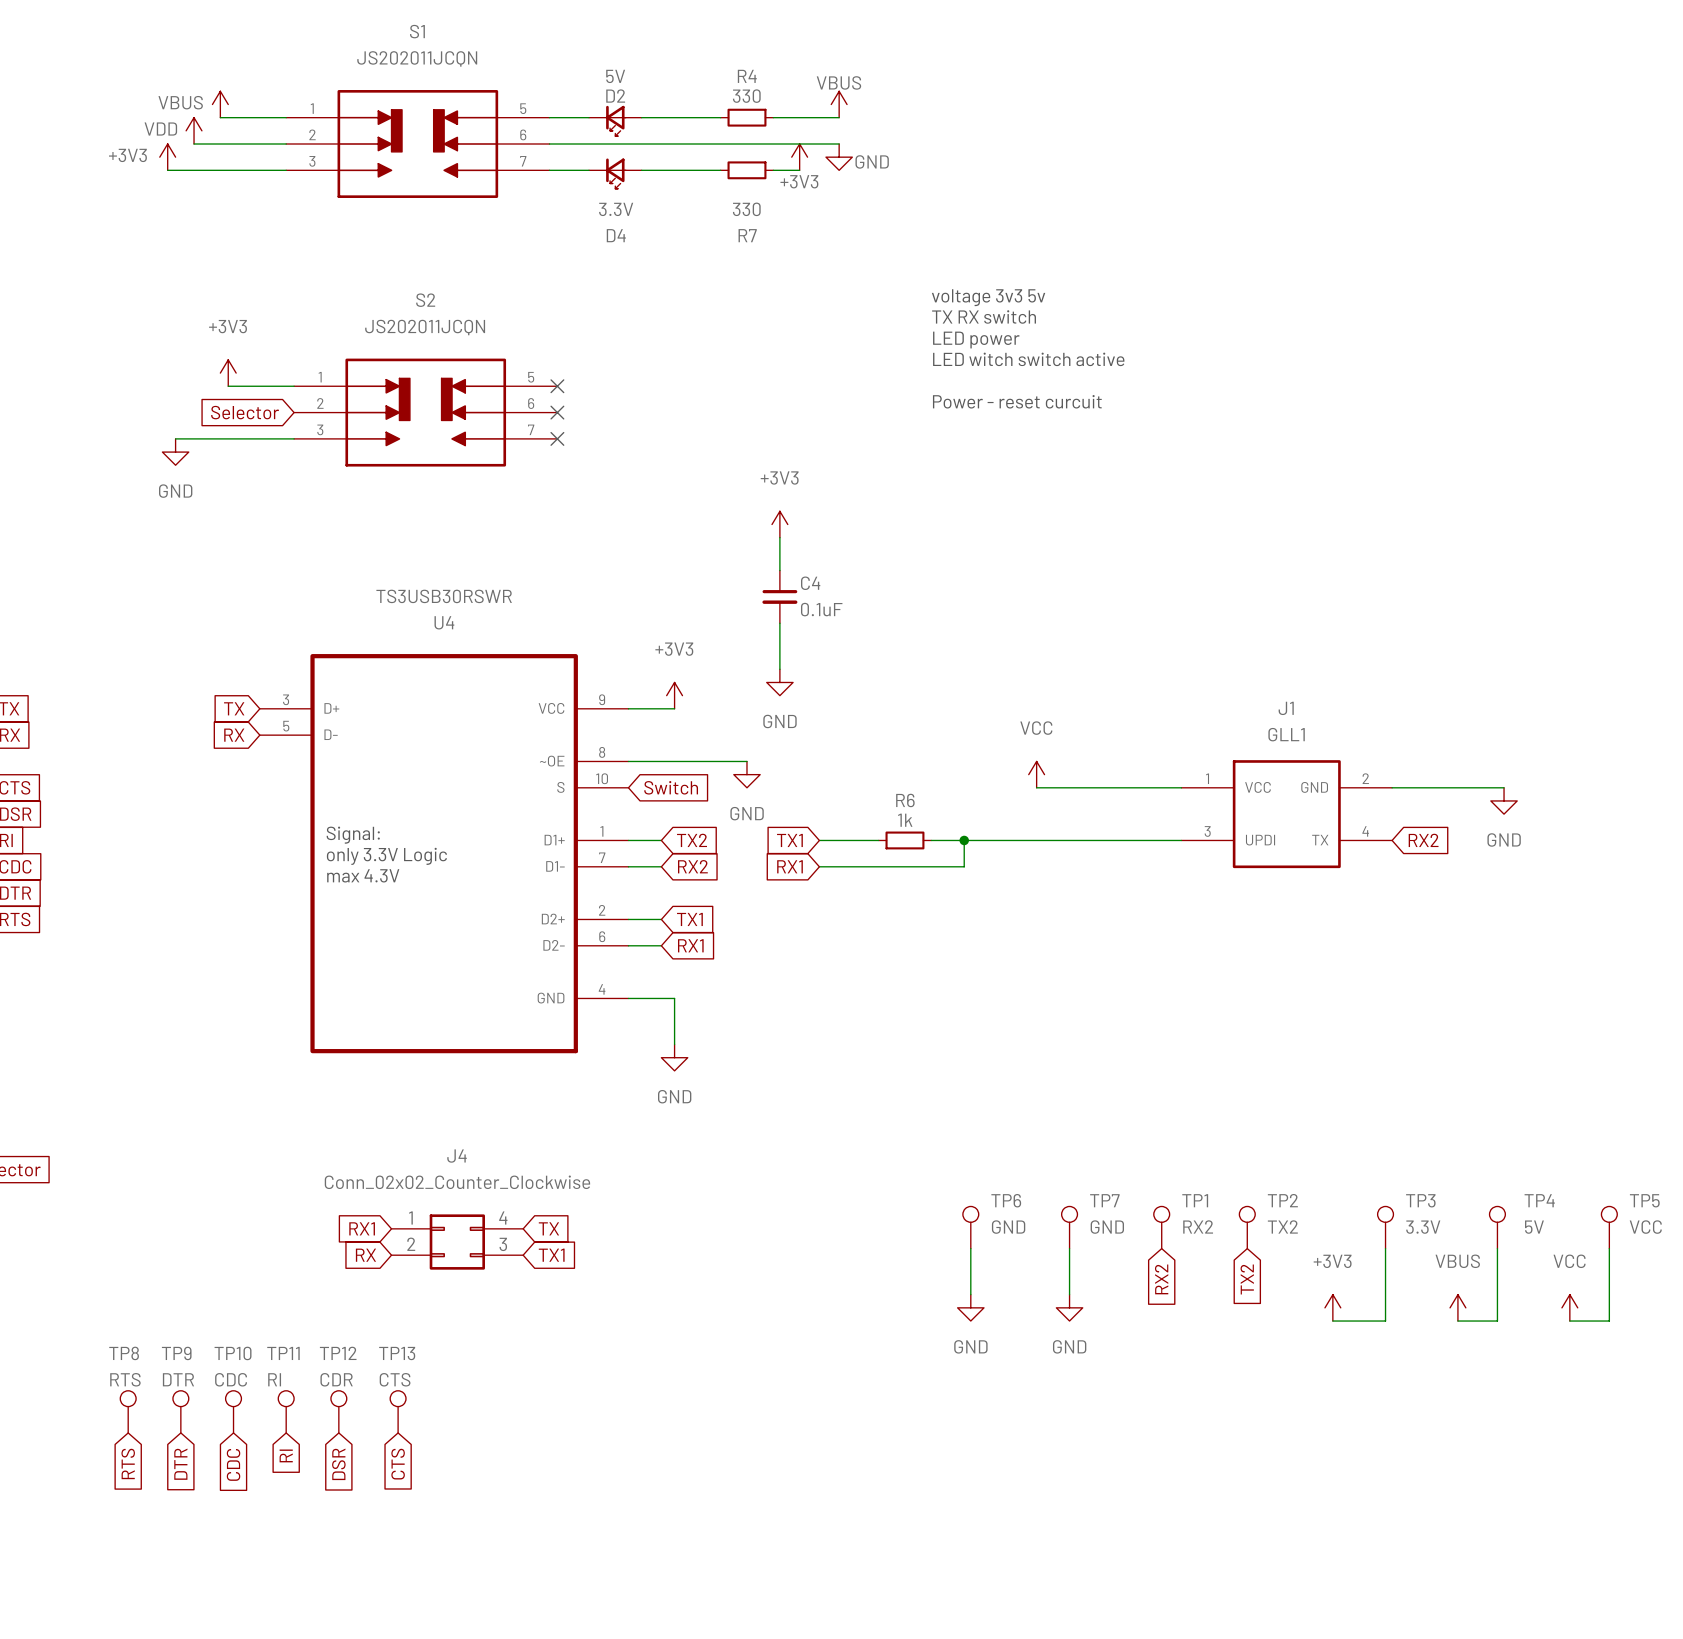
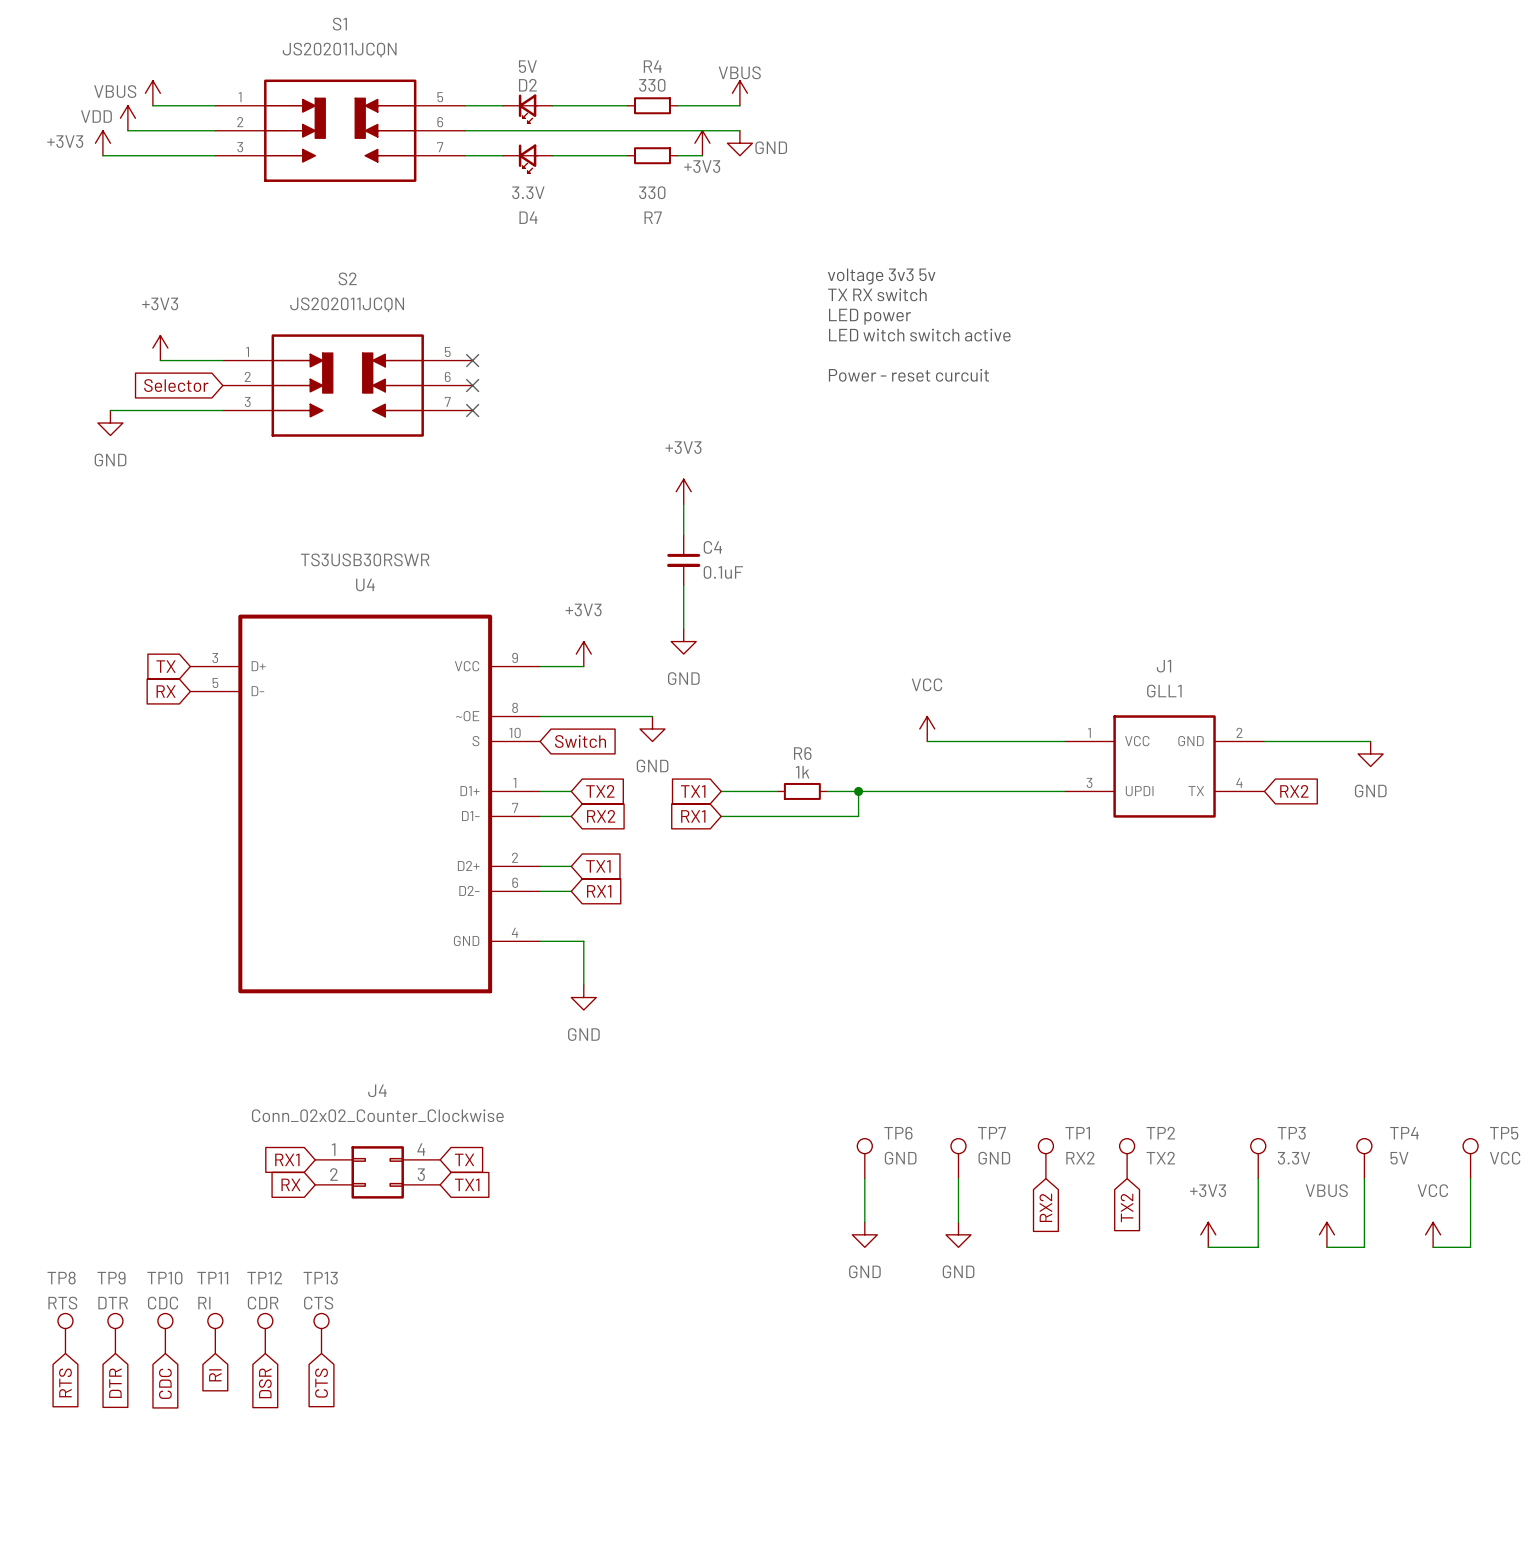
text: Signal: (353, 835) -> none
text: only 3.3V Logic (386, 856) -> none
text: max 4.3V (363, 875) -> none

